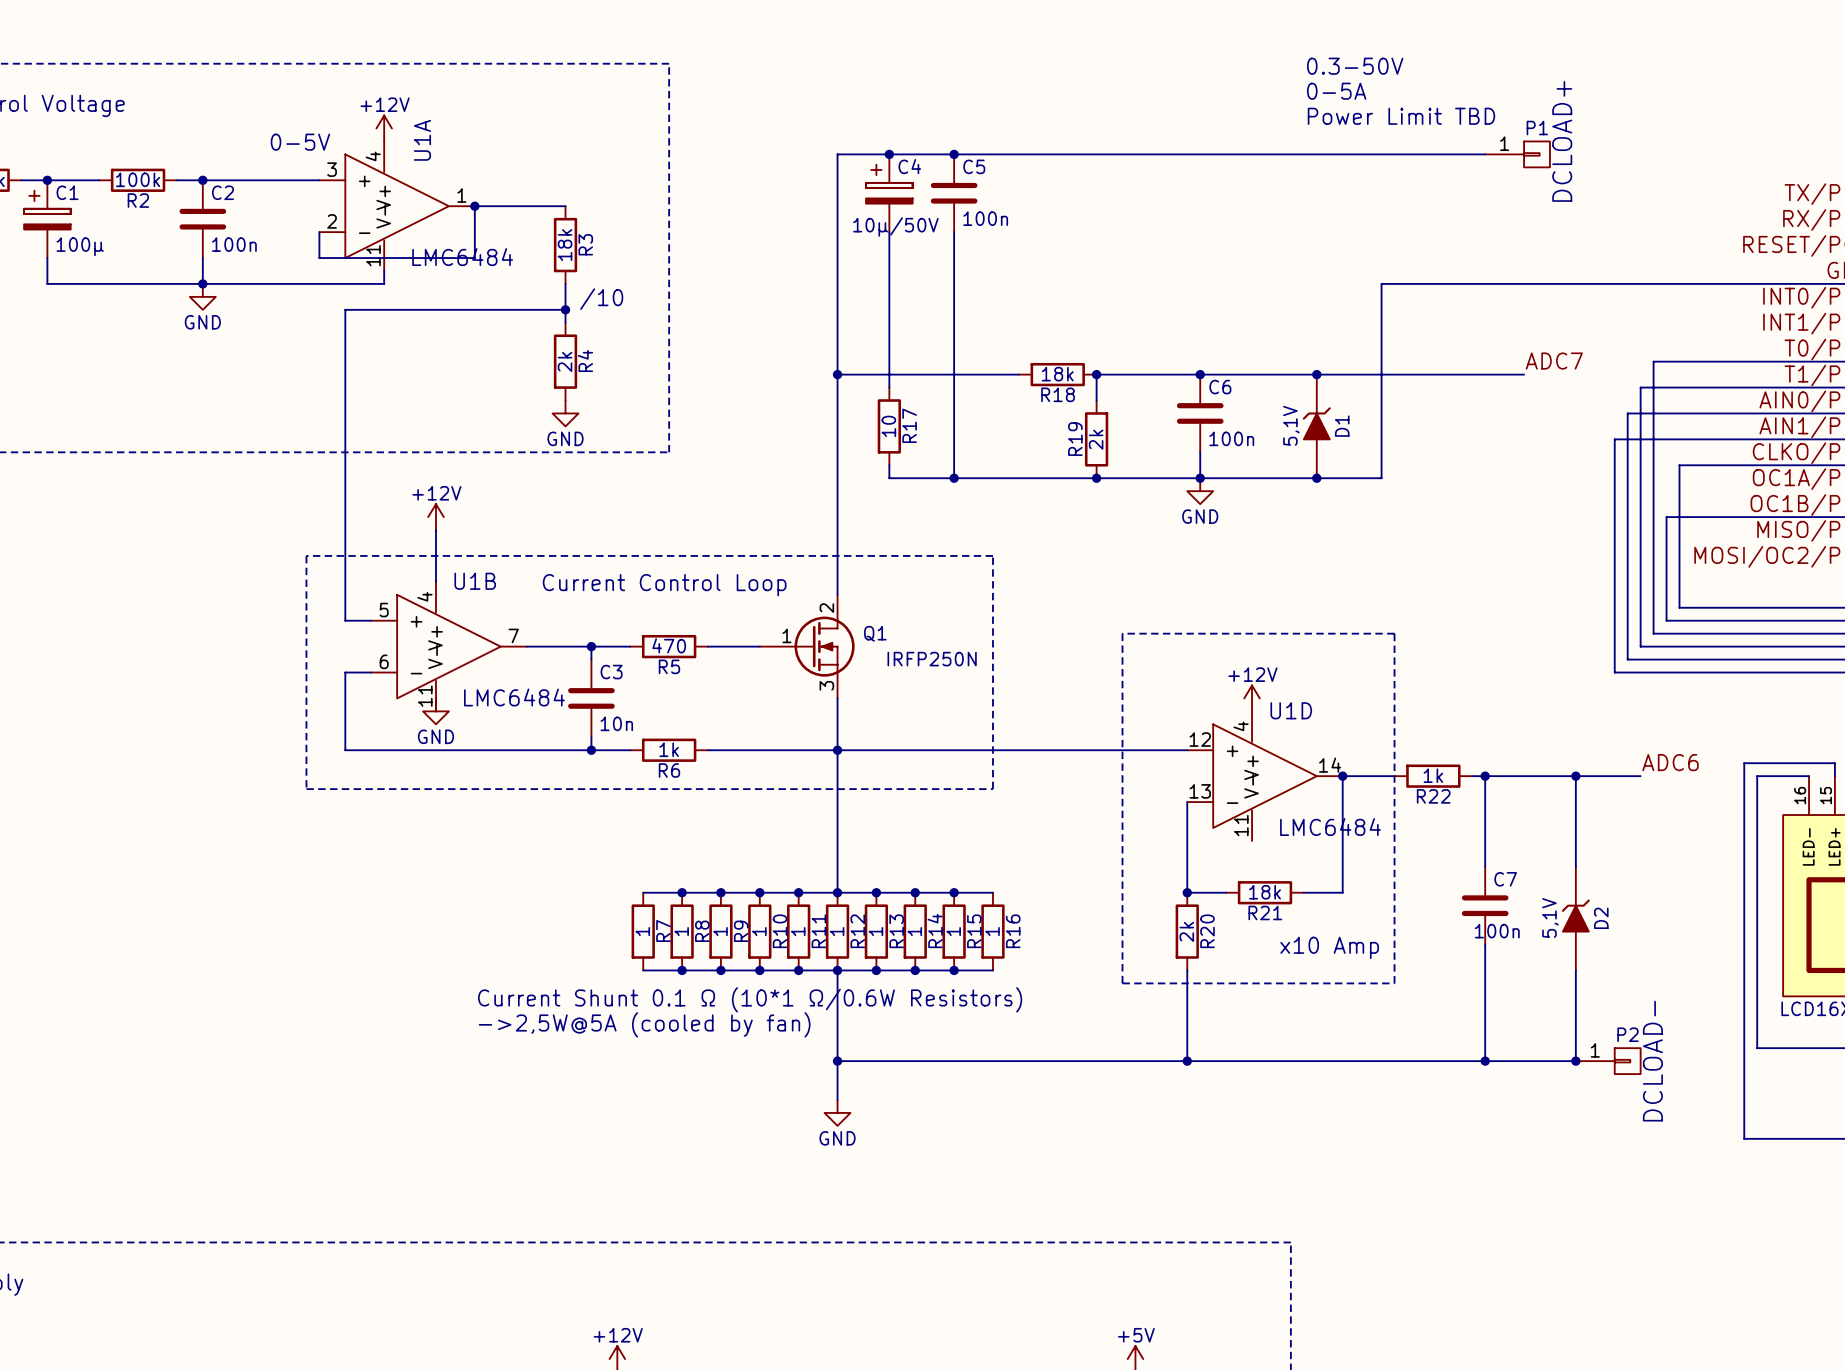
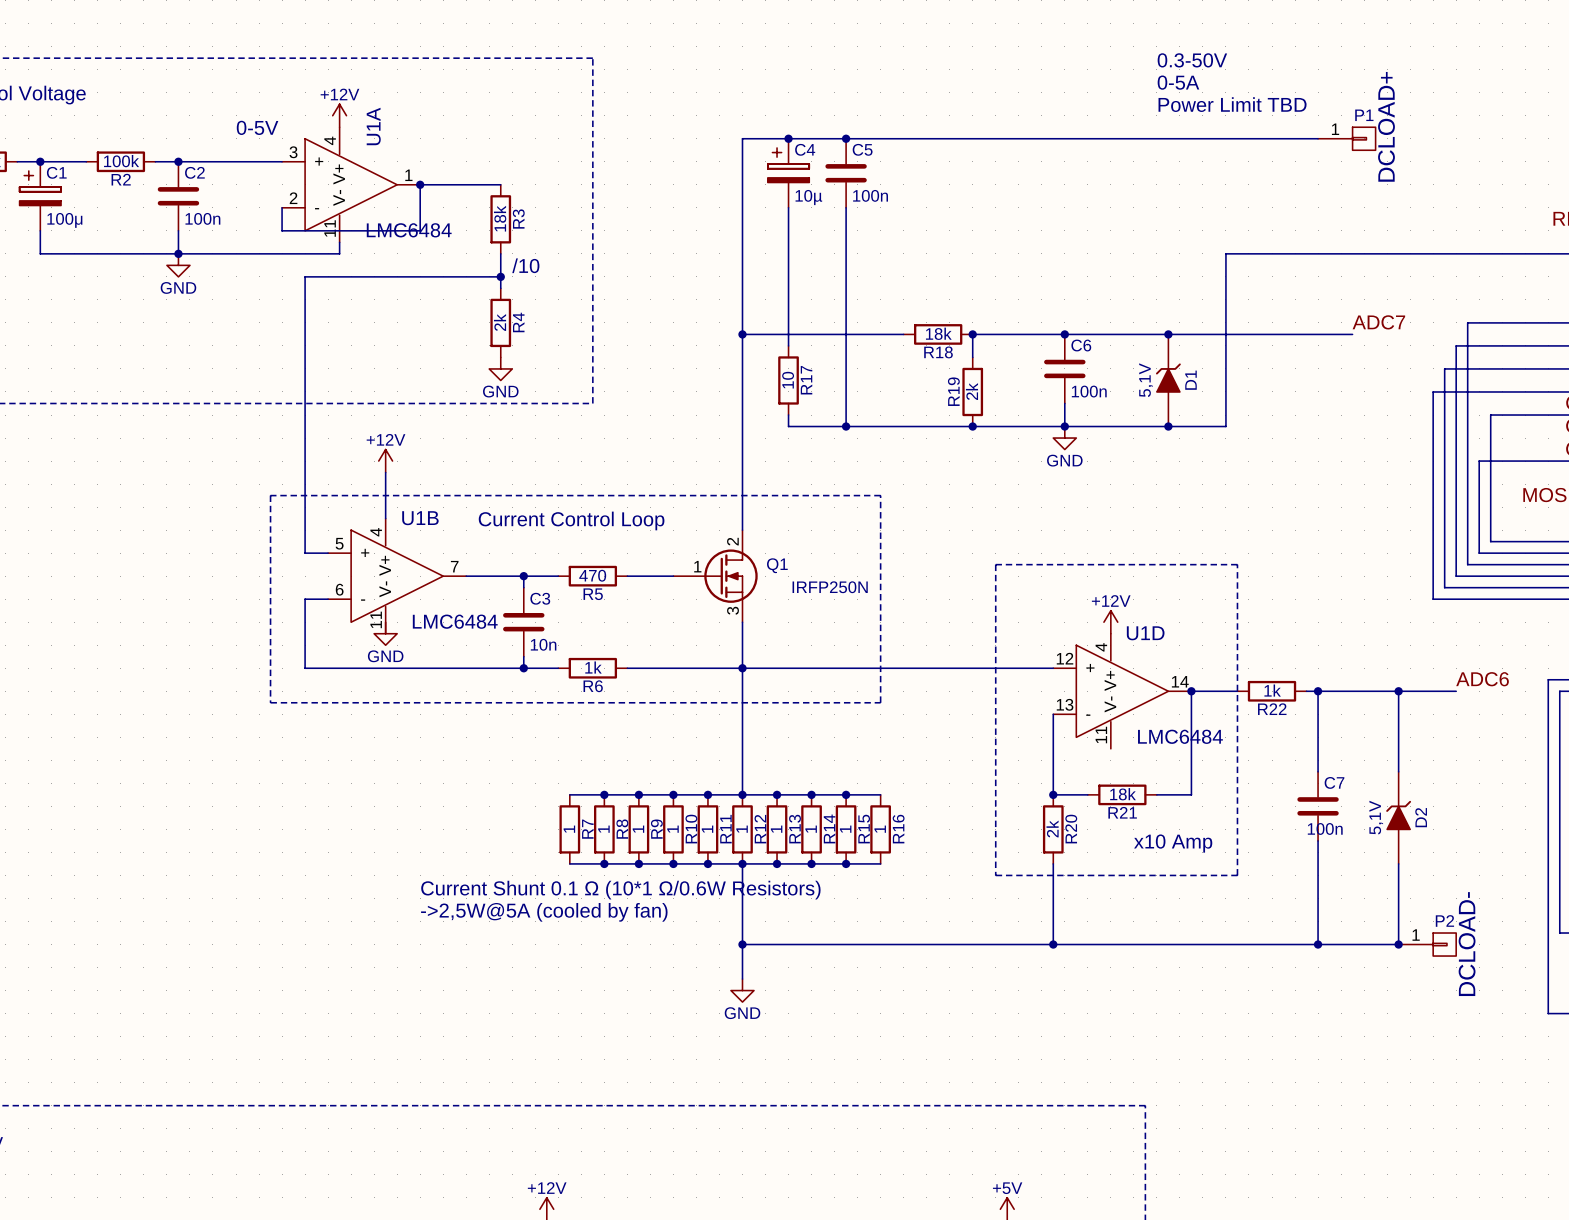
C4 value: 10µ/50V (895, 227) -> 10µ (808, 197)

